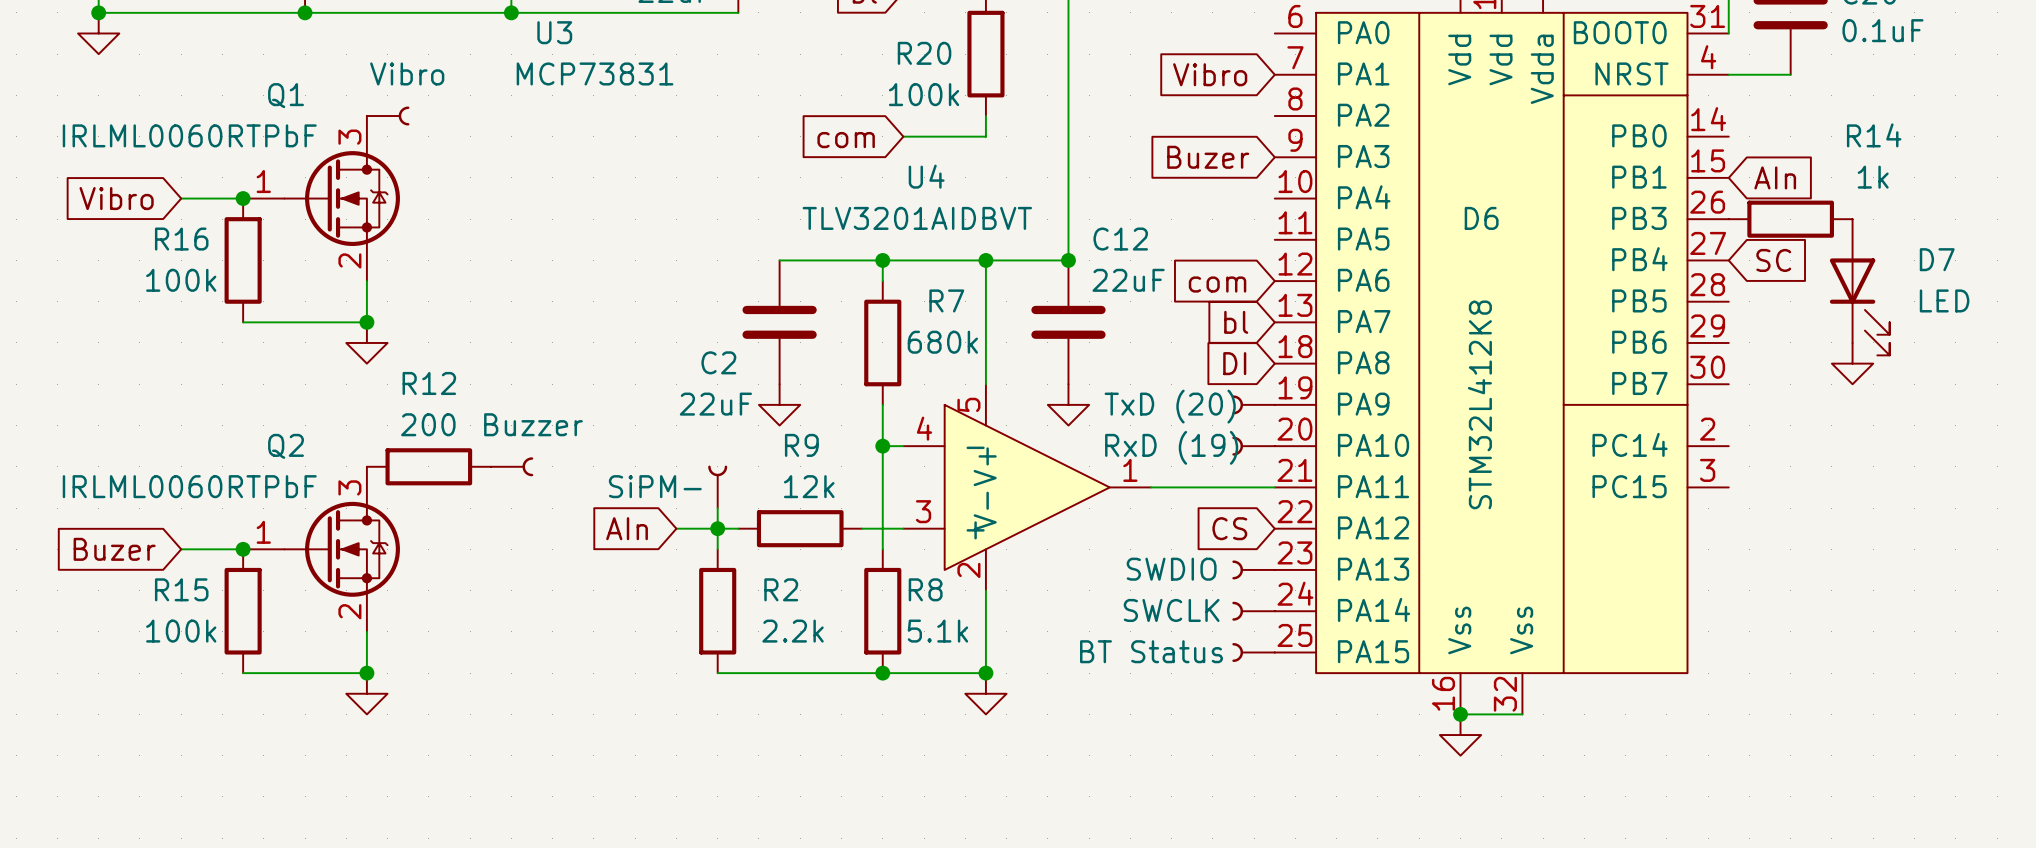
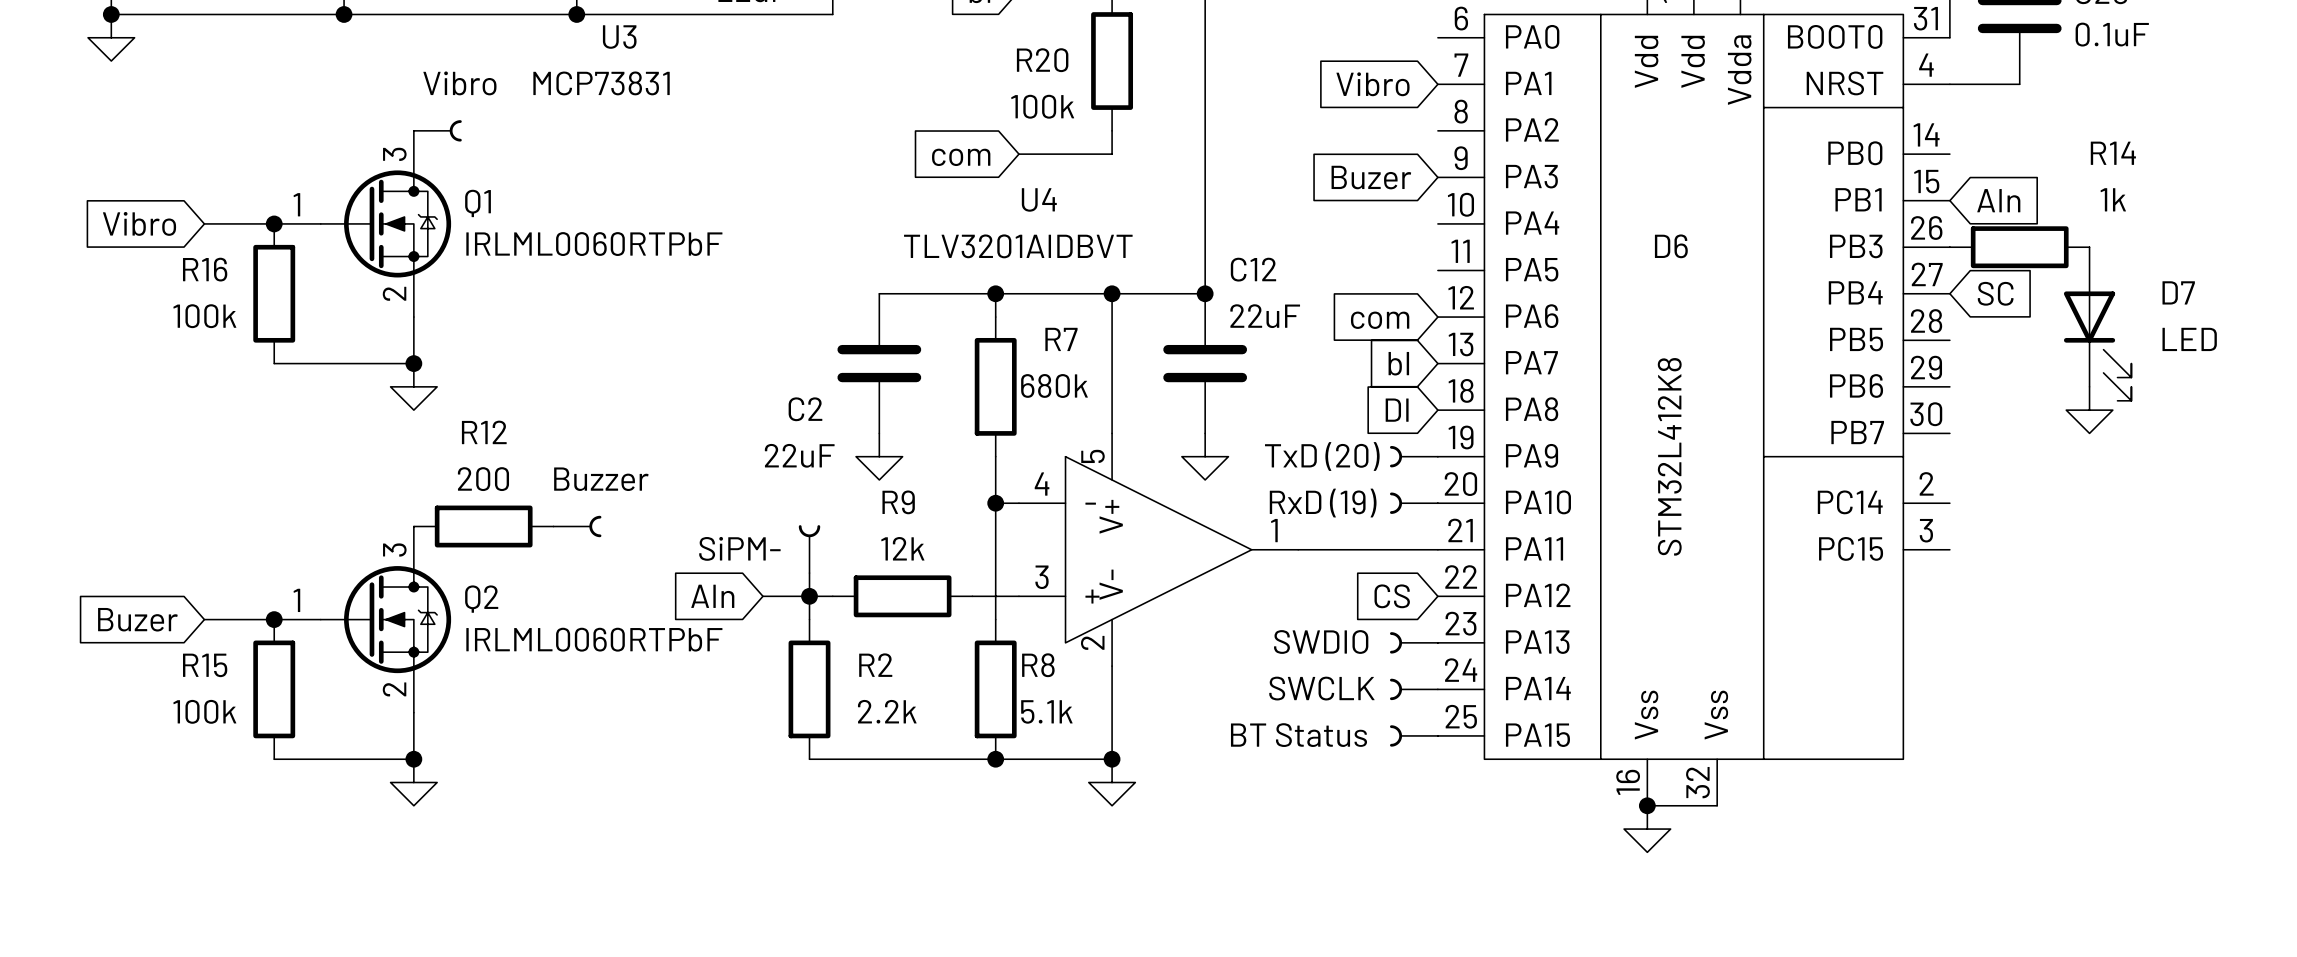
U3 value position: MCP73831 (595, 73) -> MCP73831 (601, 83)
Q1 name position: Q1 (286, 95) -> Q1 (478, 203)
Q1 value position: IRLML0060RTPbF (189, 135) -> IRLML0060RTPbF (594, 244)
Q2 name position: Q2 (286, 446) -> Q2 (481, 599)
Q2 value position: IRLML0060RTPbF (189, 486) -> IRLML0060RTPbF (594, 639)

